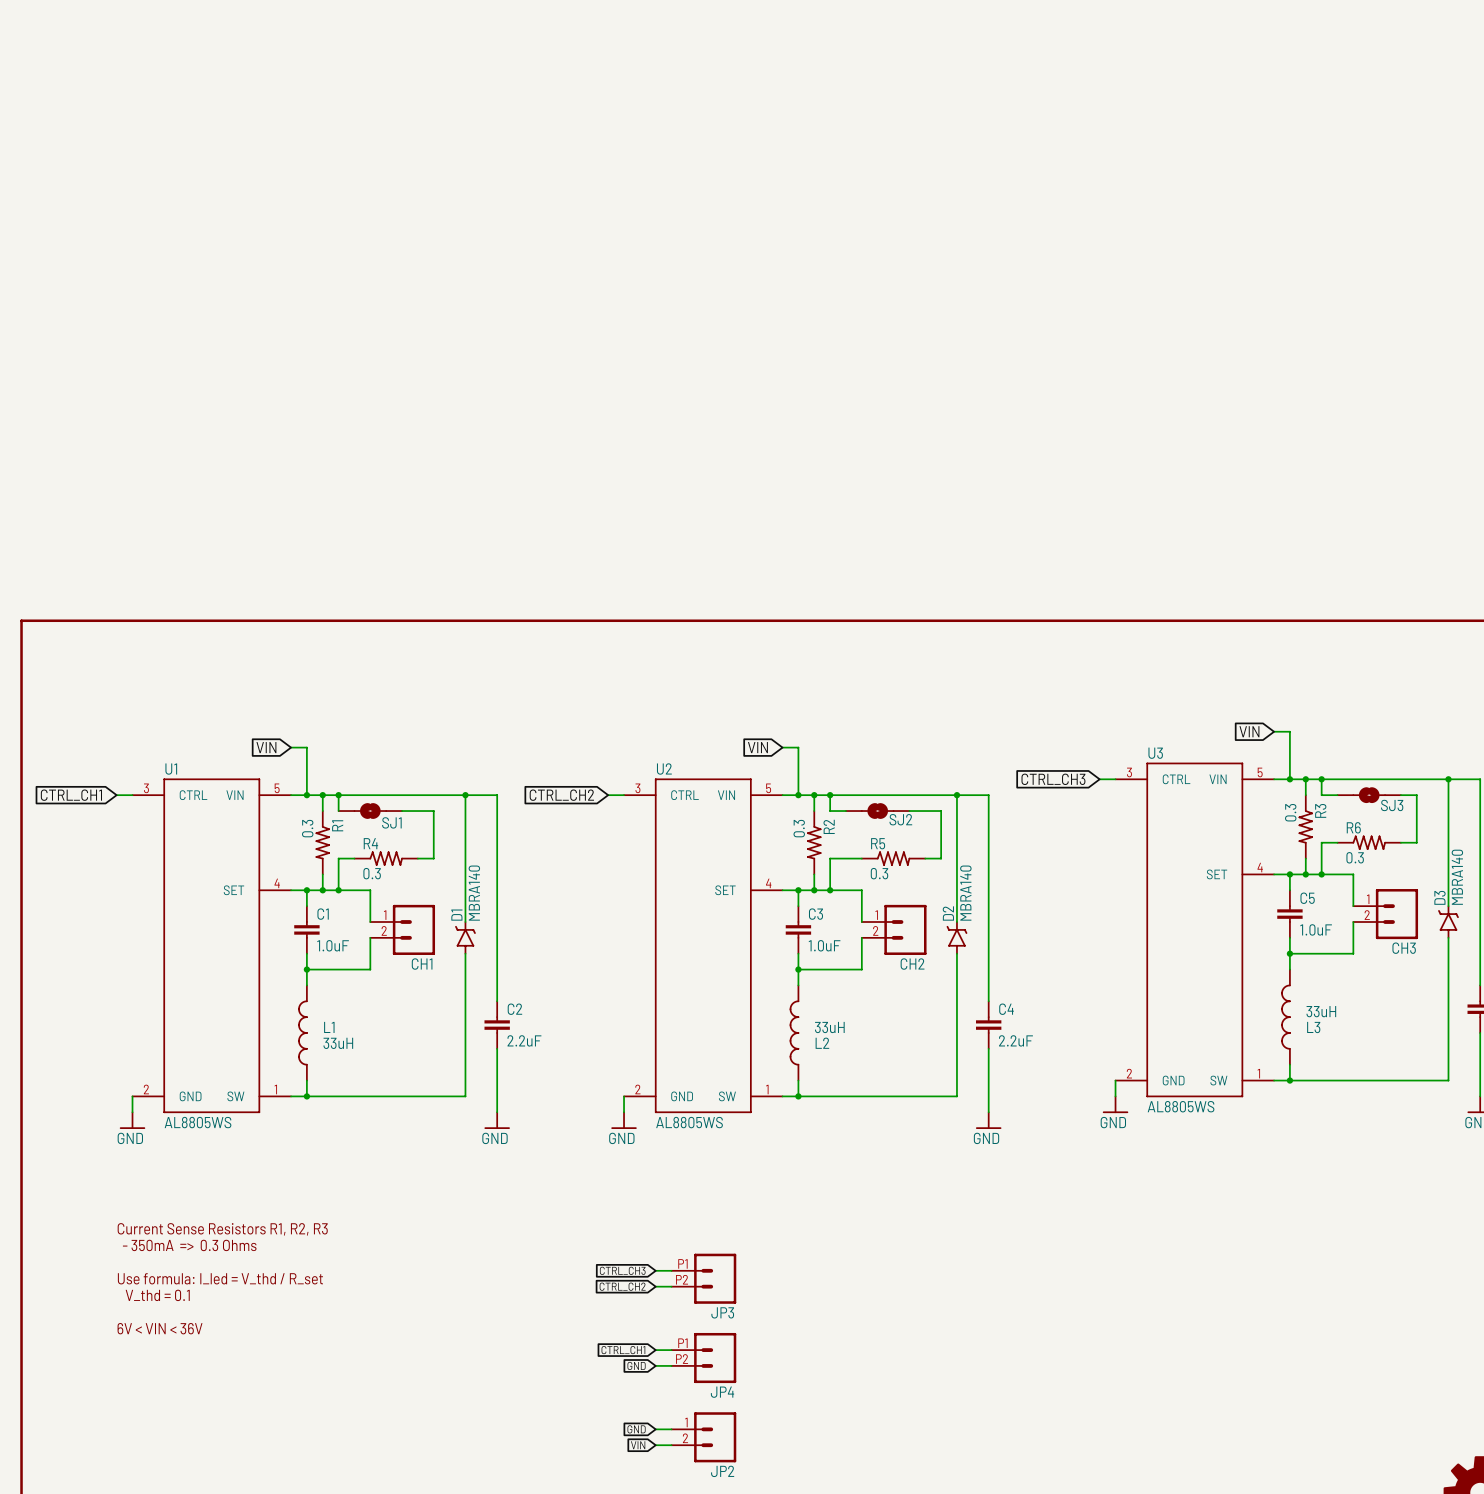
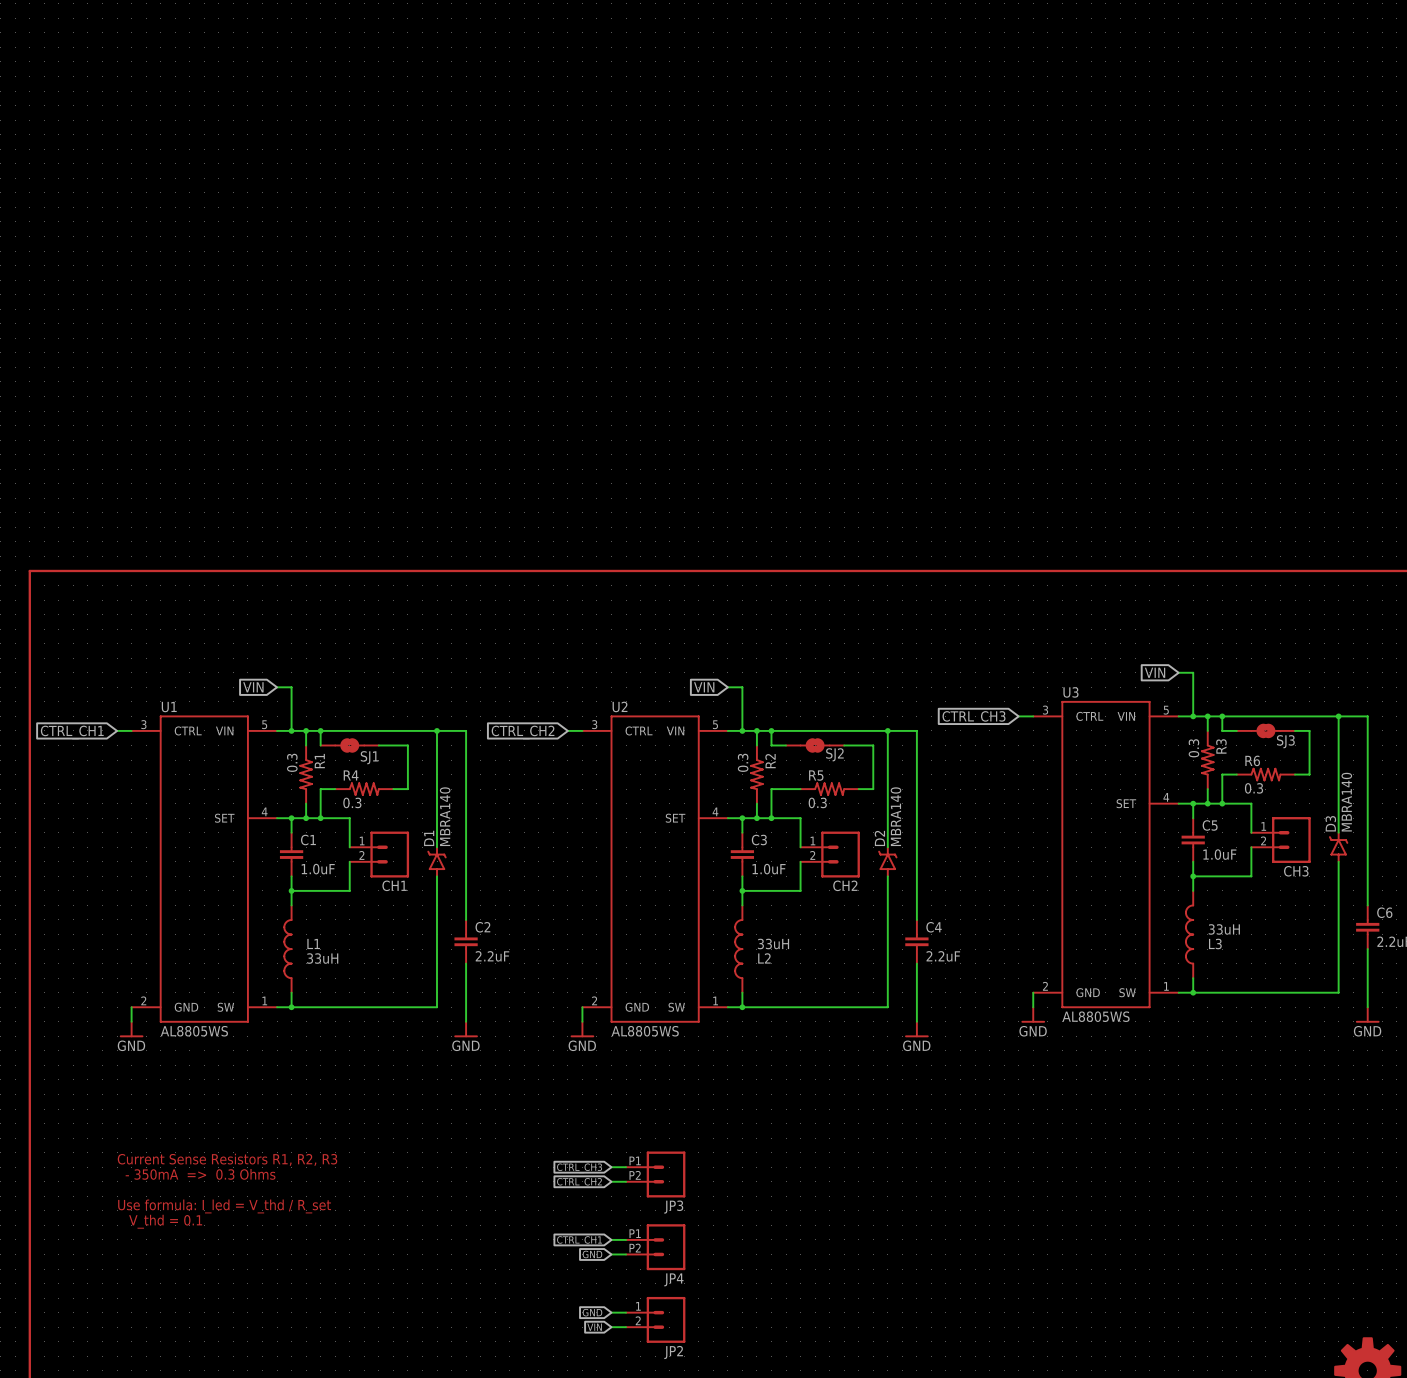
text position: Current Sense Resistors R1, R2, R3 (222, 1229) -> Current Sense Resistors R1, R2, R3 (227, 1159)
text: - 350mA => 0.3 Ohms (189, 1245) -> none
text: Use formula: I_led = V_thd / R_set (220, 1278) -> - 350mA => 0.3 Ohms (200, 1174)
text: V_thd = 0.1 (157, 1295) -> none
text: none -> Use formula: I_led = V_thd / R_set (224, 1206)
text: 6V < VIN < 36V (160, 1328) -> V_thd = 0.1 (165, 1221)

